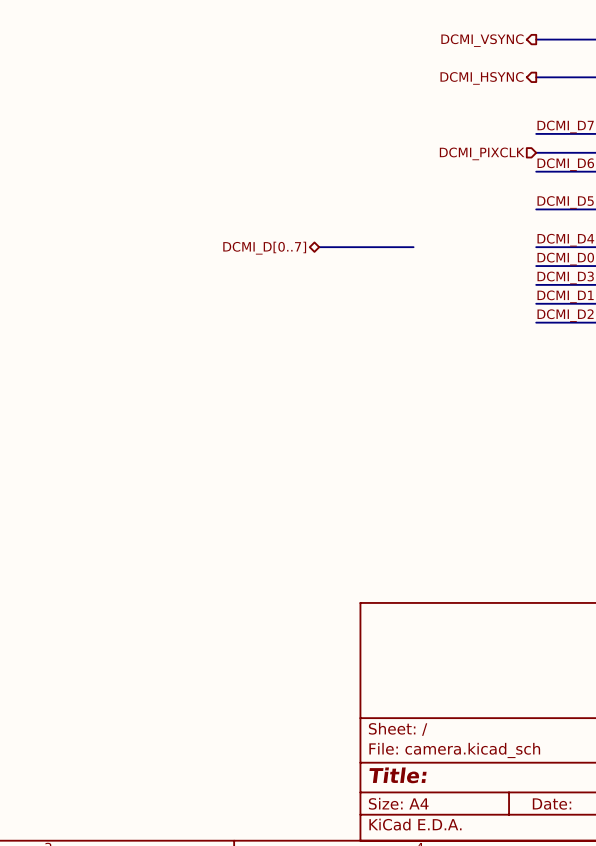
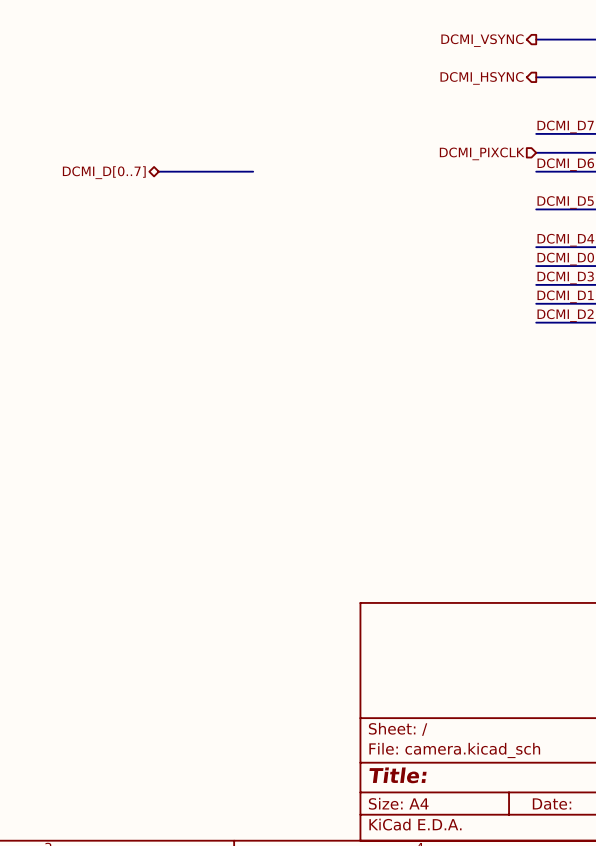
bus: (319, 247) (413, 247) -> (158, 171) (253, 171)
hierarchical label position: DCMI_D[0..7] (264, 248) -> DCMI_D[0..7] (104, 172)

